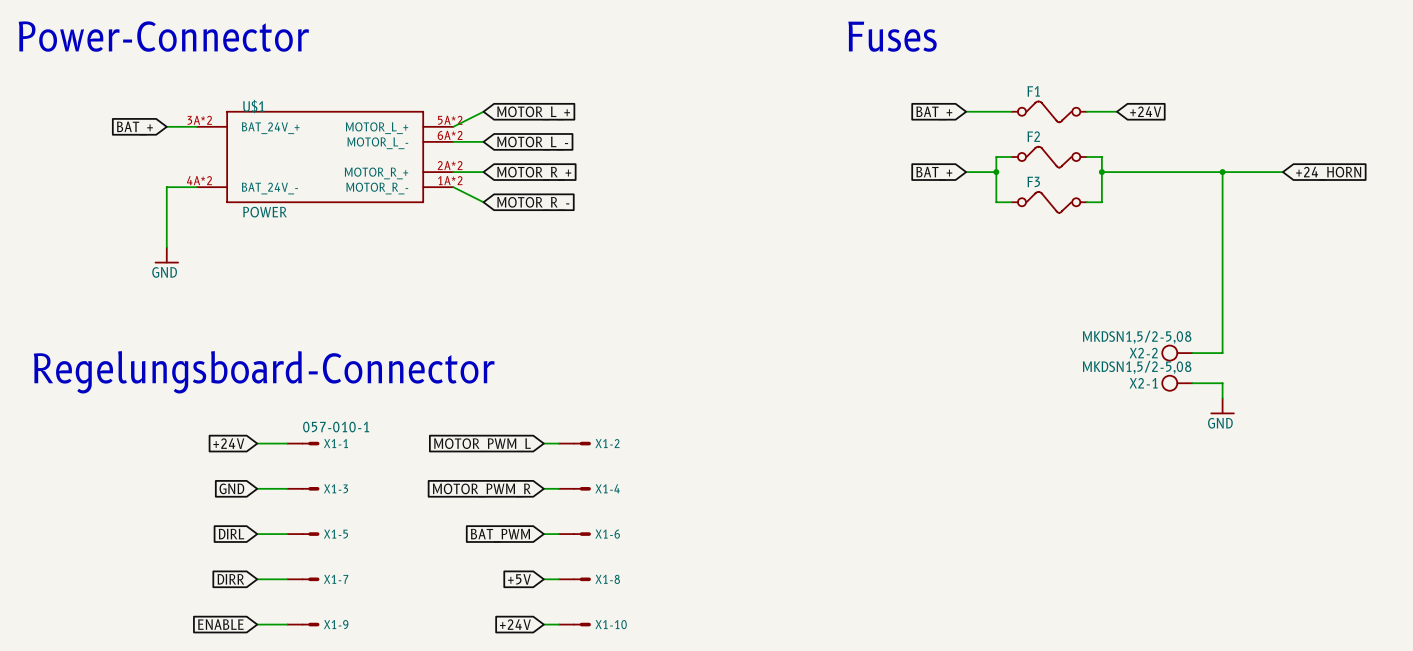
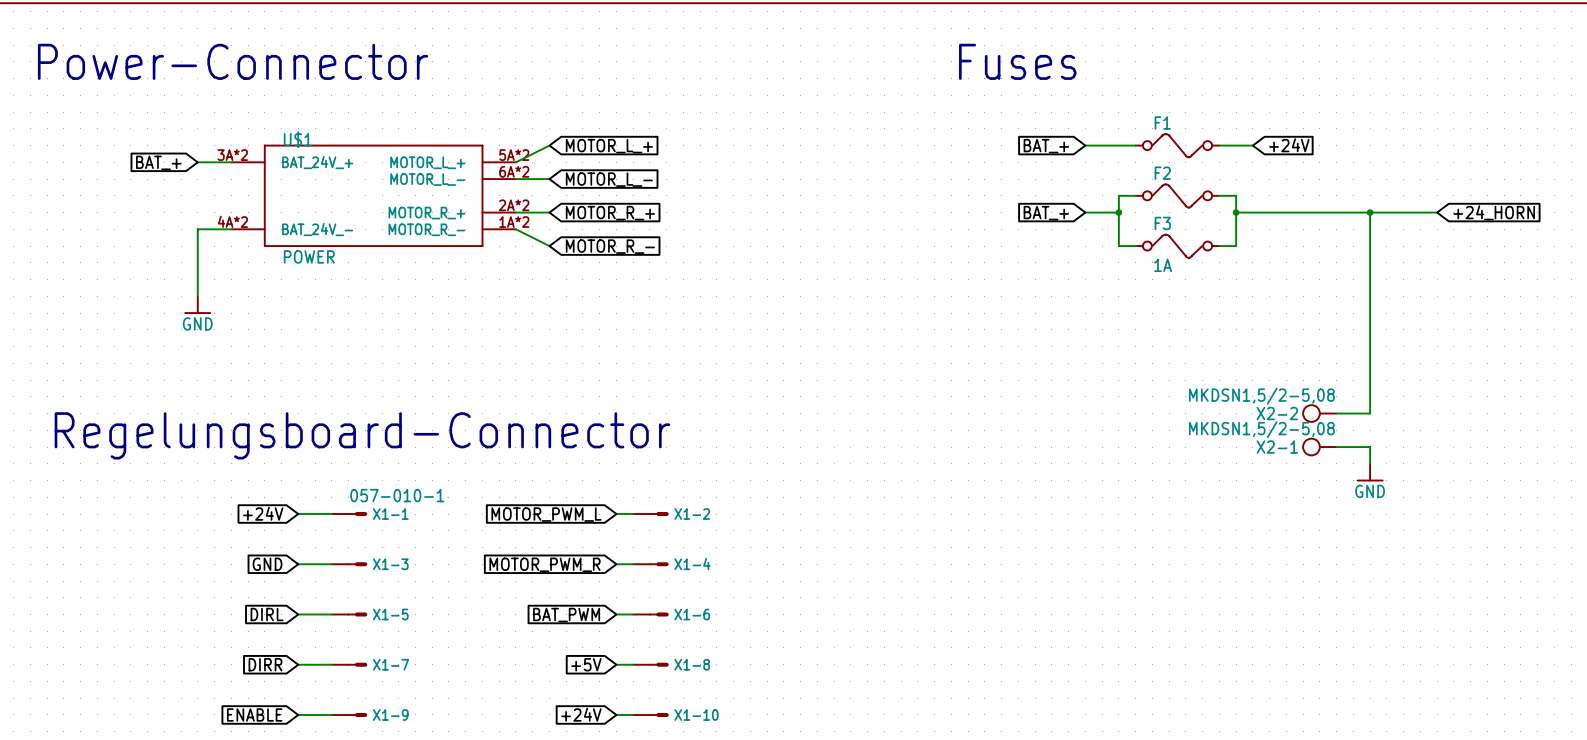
F3 value: none -> 1A (1163, 265)

